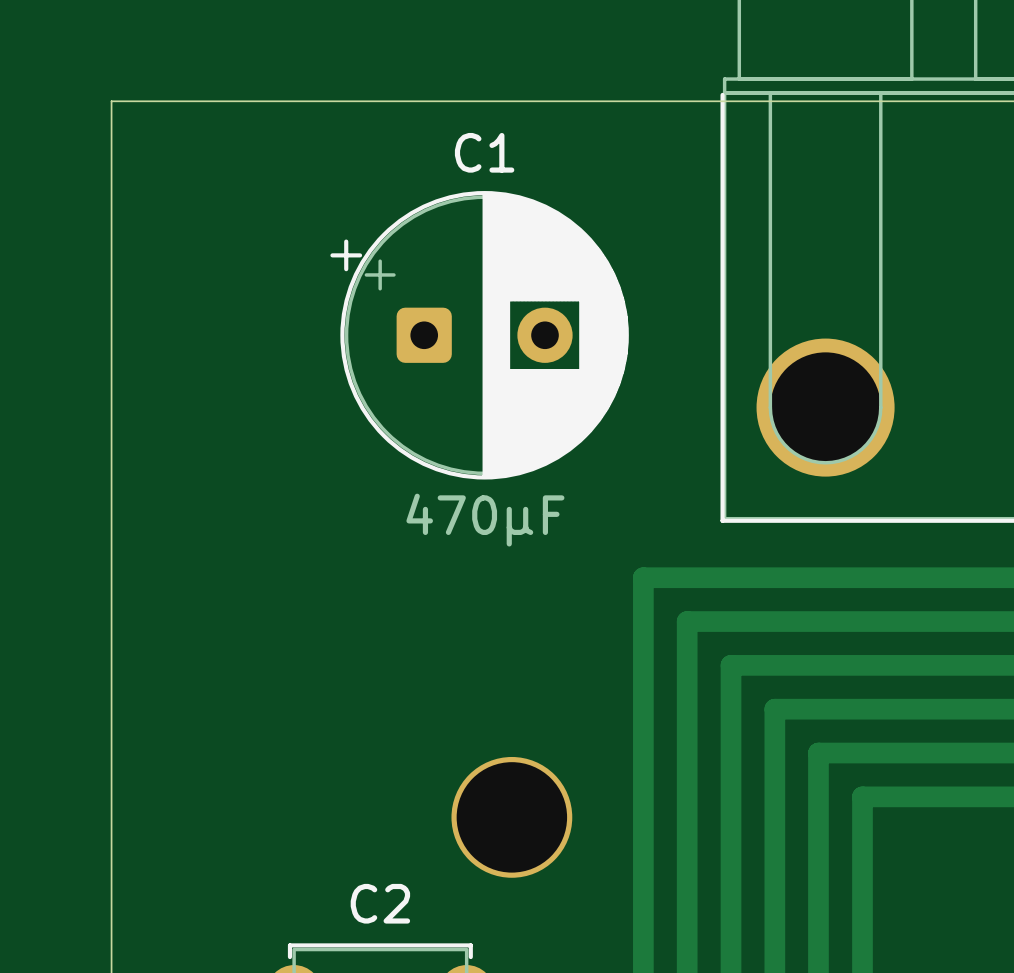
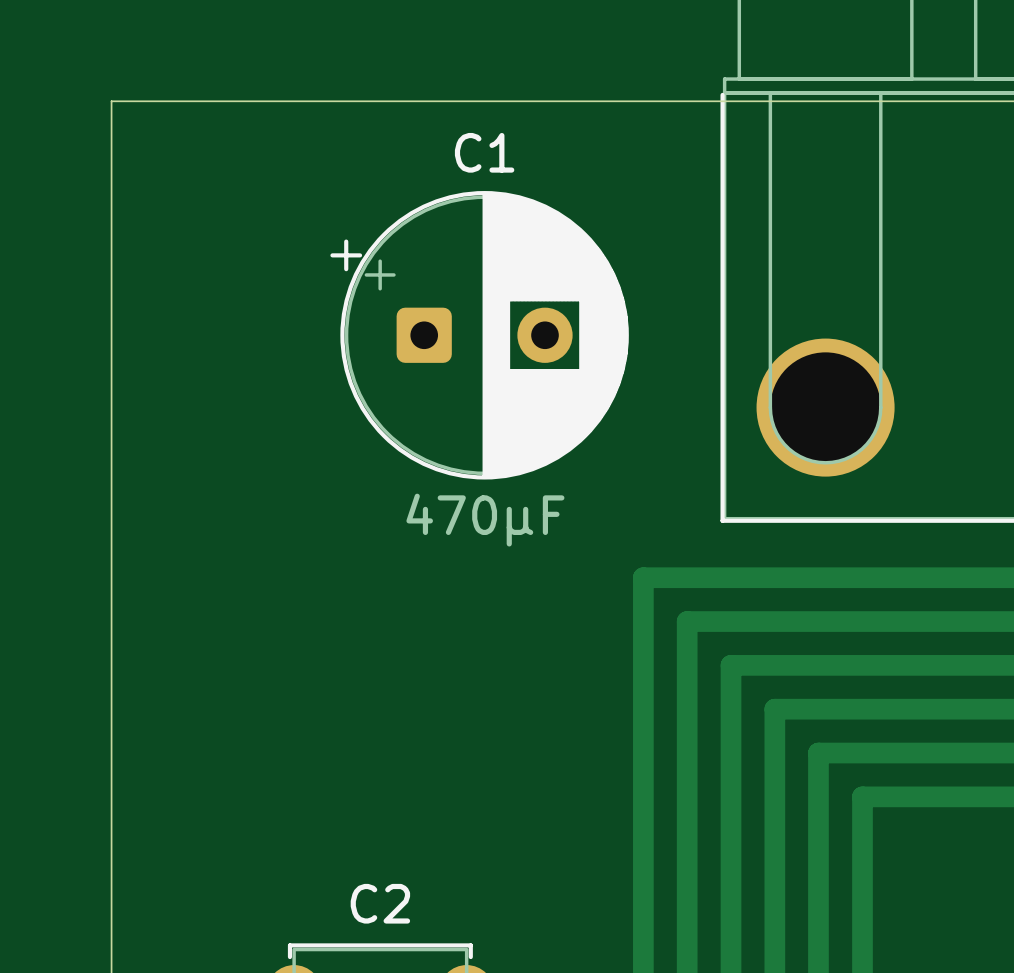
part: (511, 817) -> none

